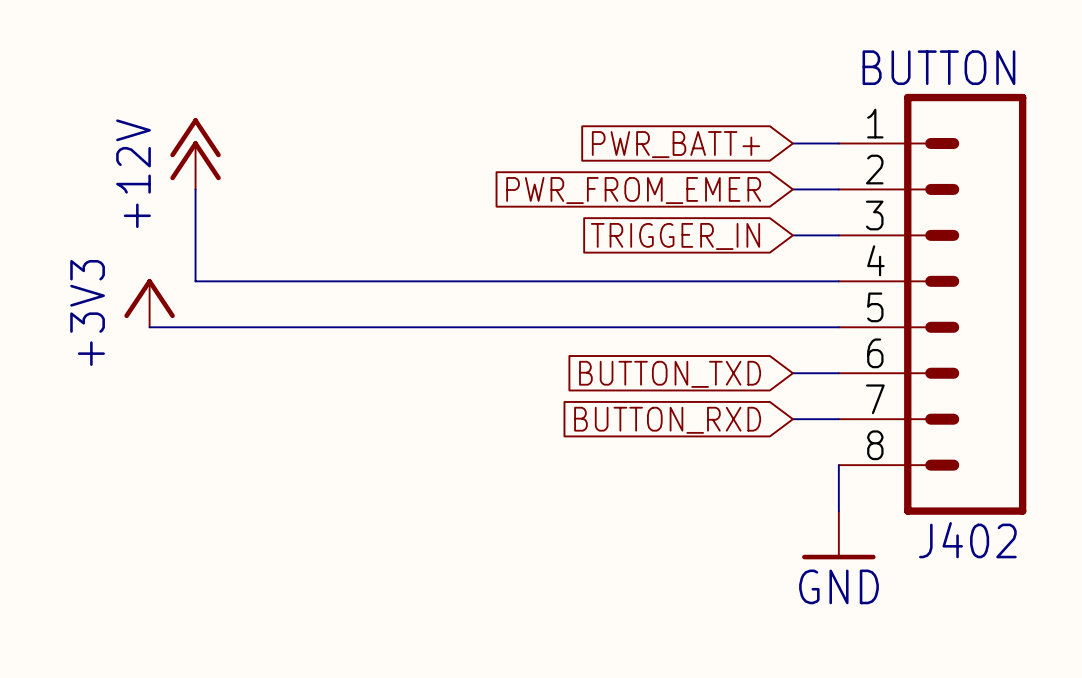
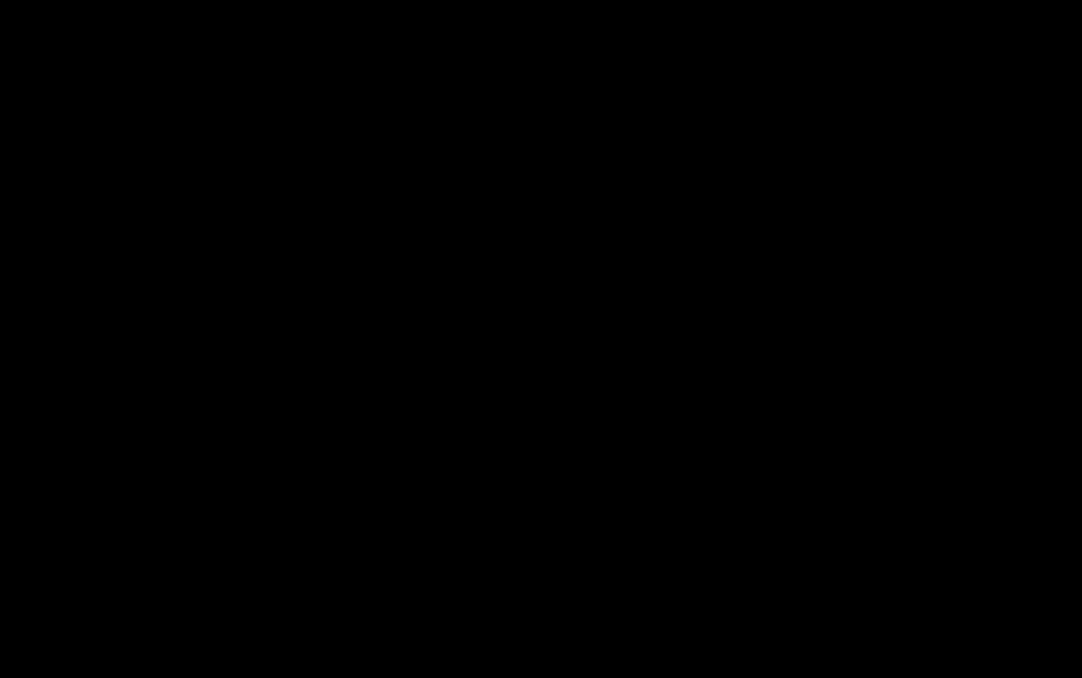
wire: (792, 143) (838, 143) -> none
global label: PWR_BATT+ (675, 144) -> none
power symbol: +12V (195, 153) -> none
wire: (195, 189) (195, 281) (838, 281) -> none
wire: (792, 189) (838, 189) -> none
global label: PWR_FROM_EMER (633, 190) -> none
wire: (792, 235) (838, 235) -> none
global label: TRIGGER_IN (675, 236) -> none
power symbol: +3V3 (149, 303) -> none
J402: BUTTON (932, 304) -> none
wire: (149, 327) (838, 327) -> none
wire: (792, 373) (838, 373) -> none
global label: BUTTON_TXD (670, 374) -> none
wire: (792, 419) (838, 419) -> none
global label: BUTTON_RXD (667, 420) -> none
wire: (838, 465) (838, 511) -> none
power symbol: GND (838, 535) -> none

